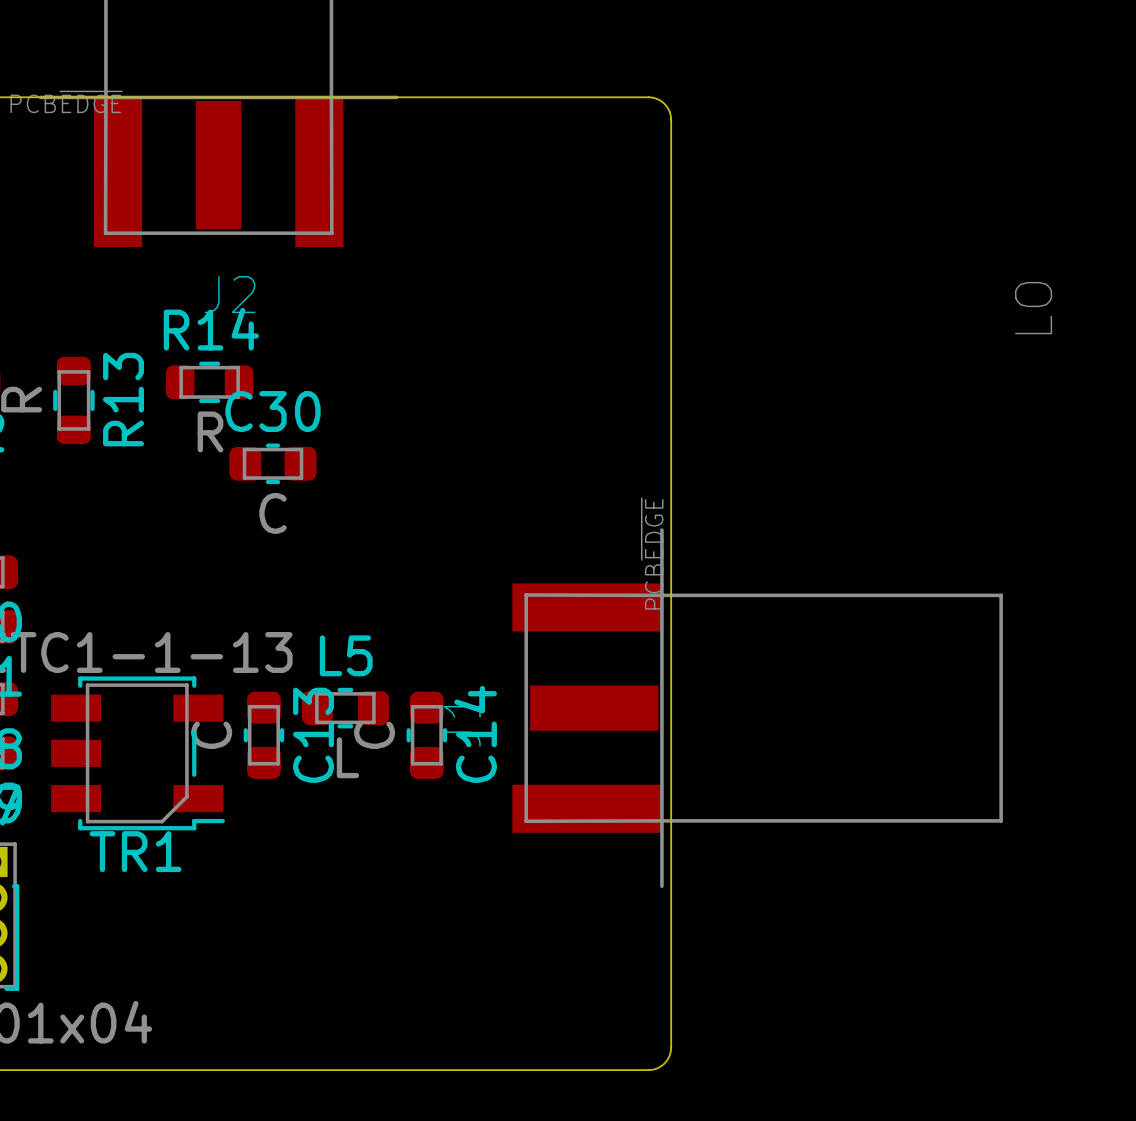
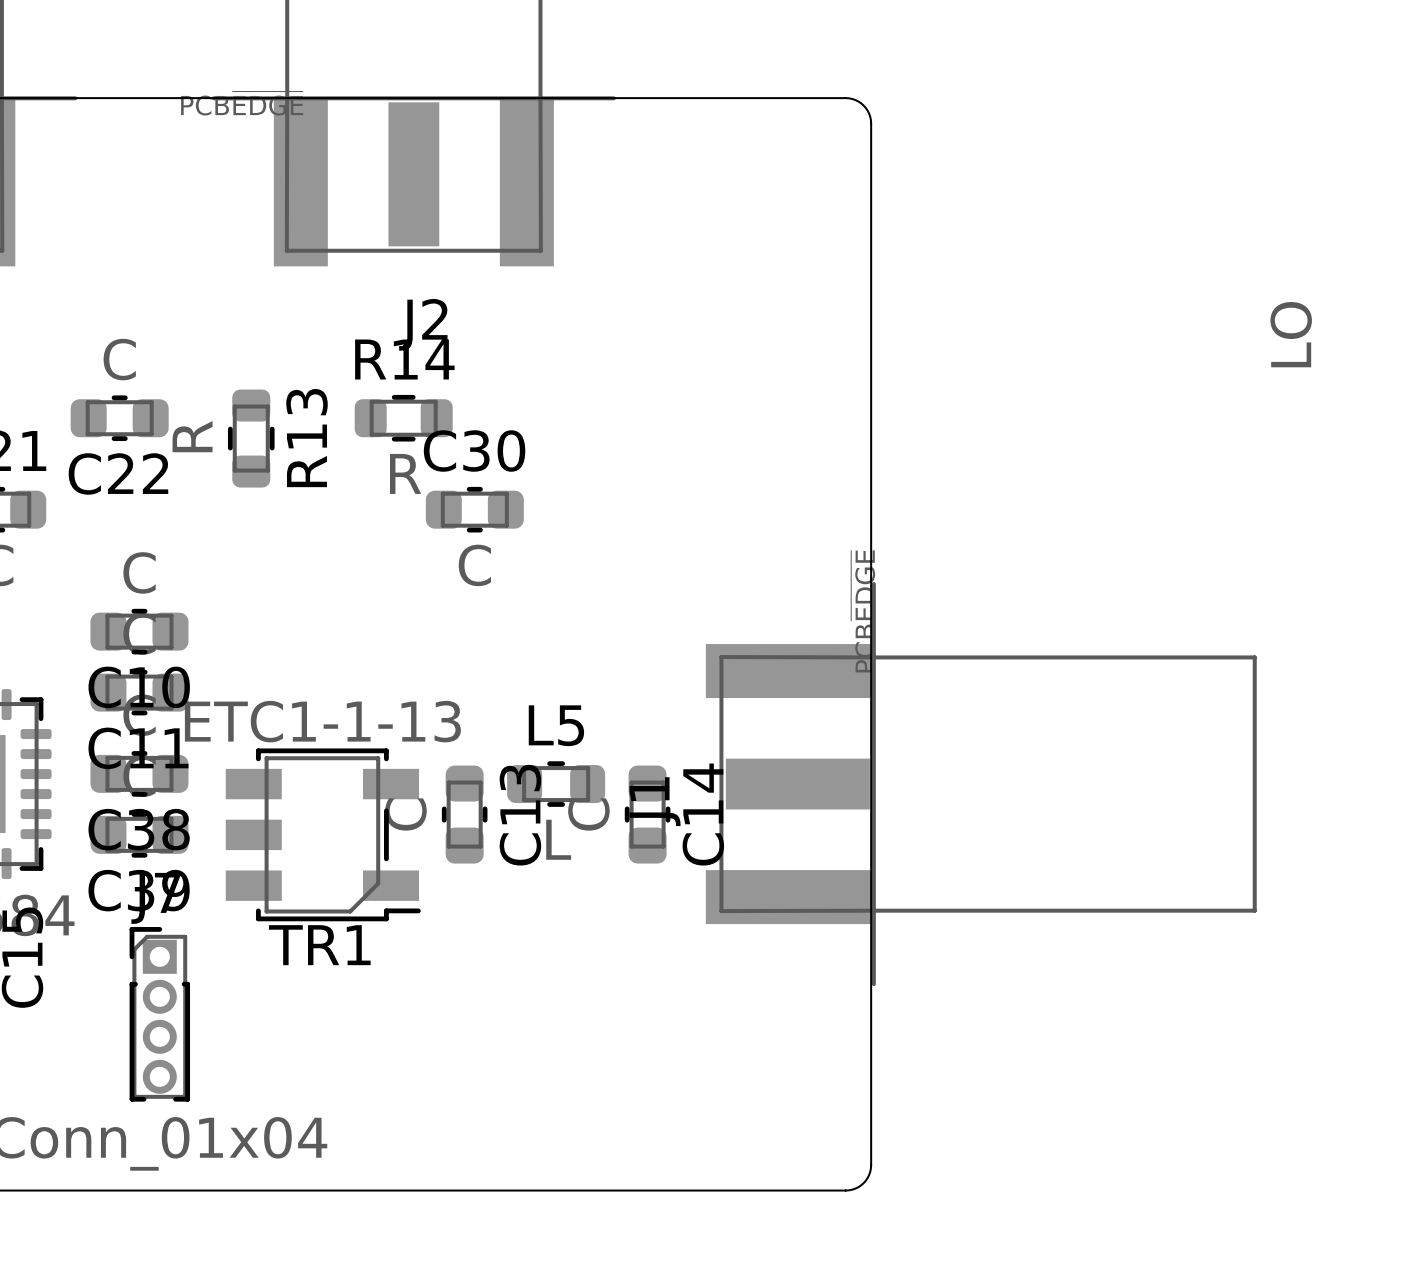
board edge: (603, 97) (648, 97) -> none
board edge: (648, 97) (657, 99) (664, 103) (669, 111) (671, 119) (671, 1047) (666, 1061) (654, 1069) (603, 1070) -> (845, 98) (855, 100) (863, 105) (869, 113) (871, 123) (871, 1165) (869, 1174) (863, 1183) (855, 1188) (845, 1190)
J1 position: (757, 708) -> (981, 784)

